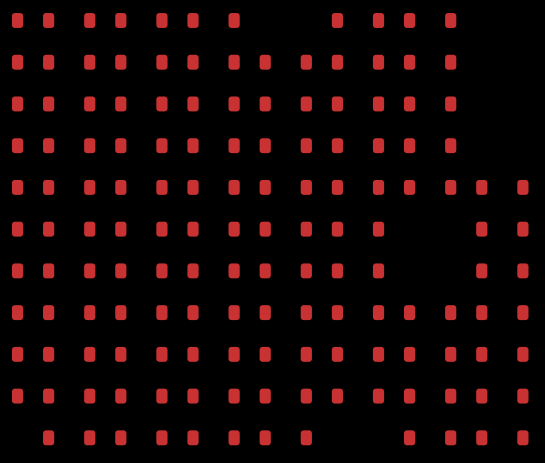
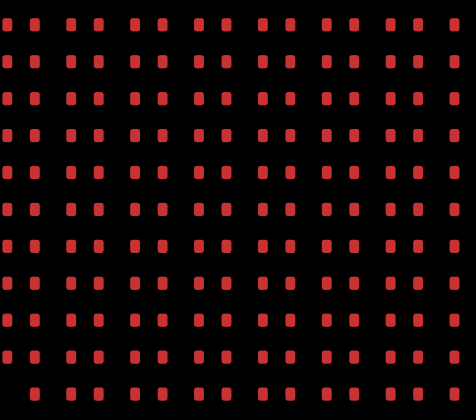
part: none -> (244, 24)
part: none -> (436, 24)
part: none -> (436, 61)
part: none -> (436, 98)
part: none -> (436, 135)
part: none -> (372, 209)
part: none -> (372, 246)
part: none -> (308, 394)

